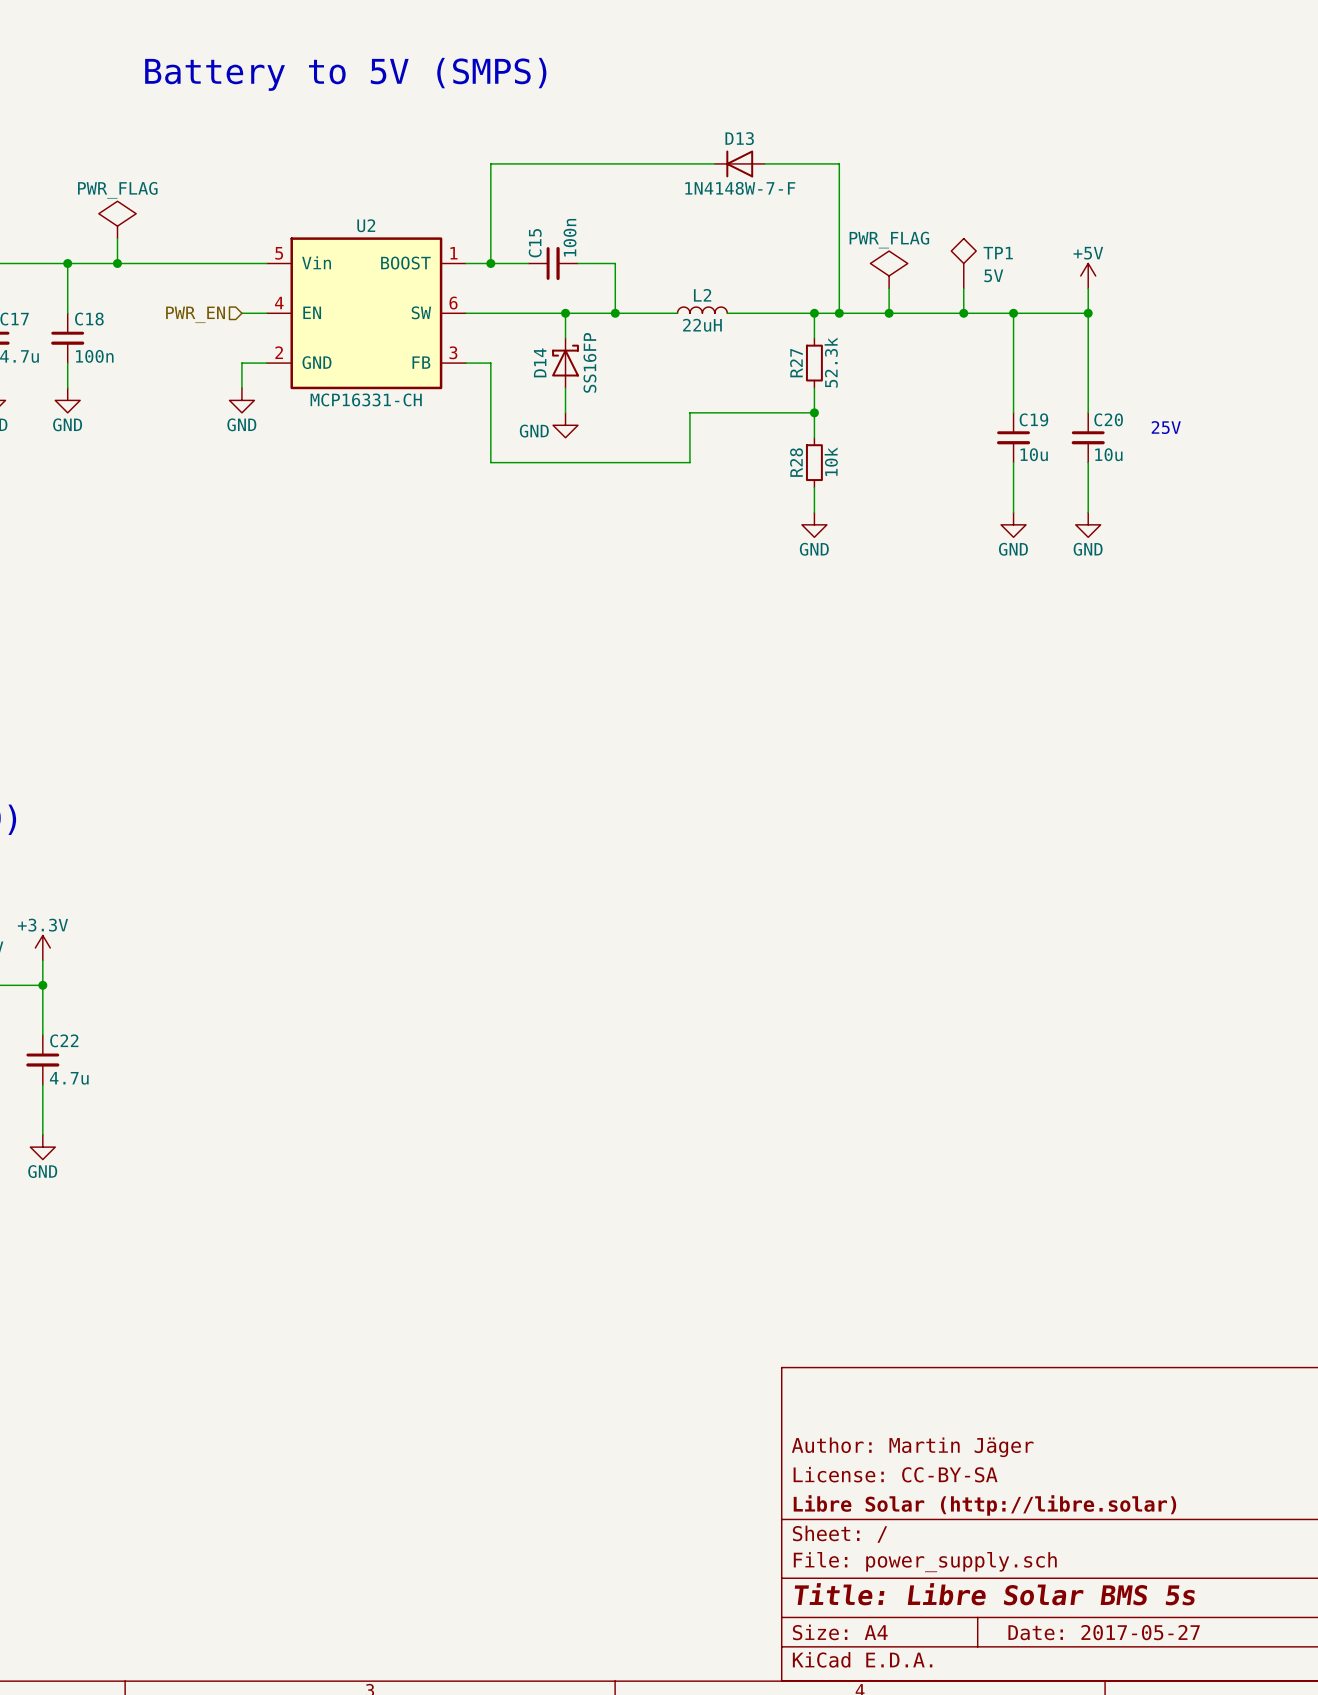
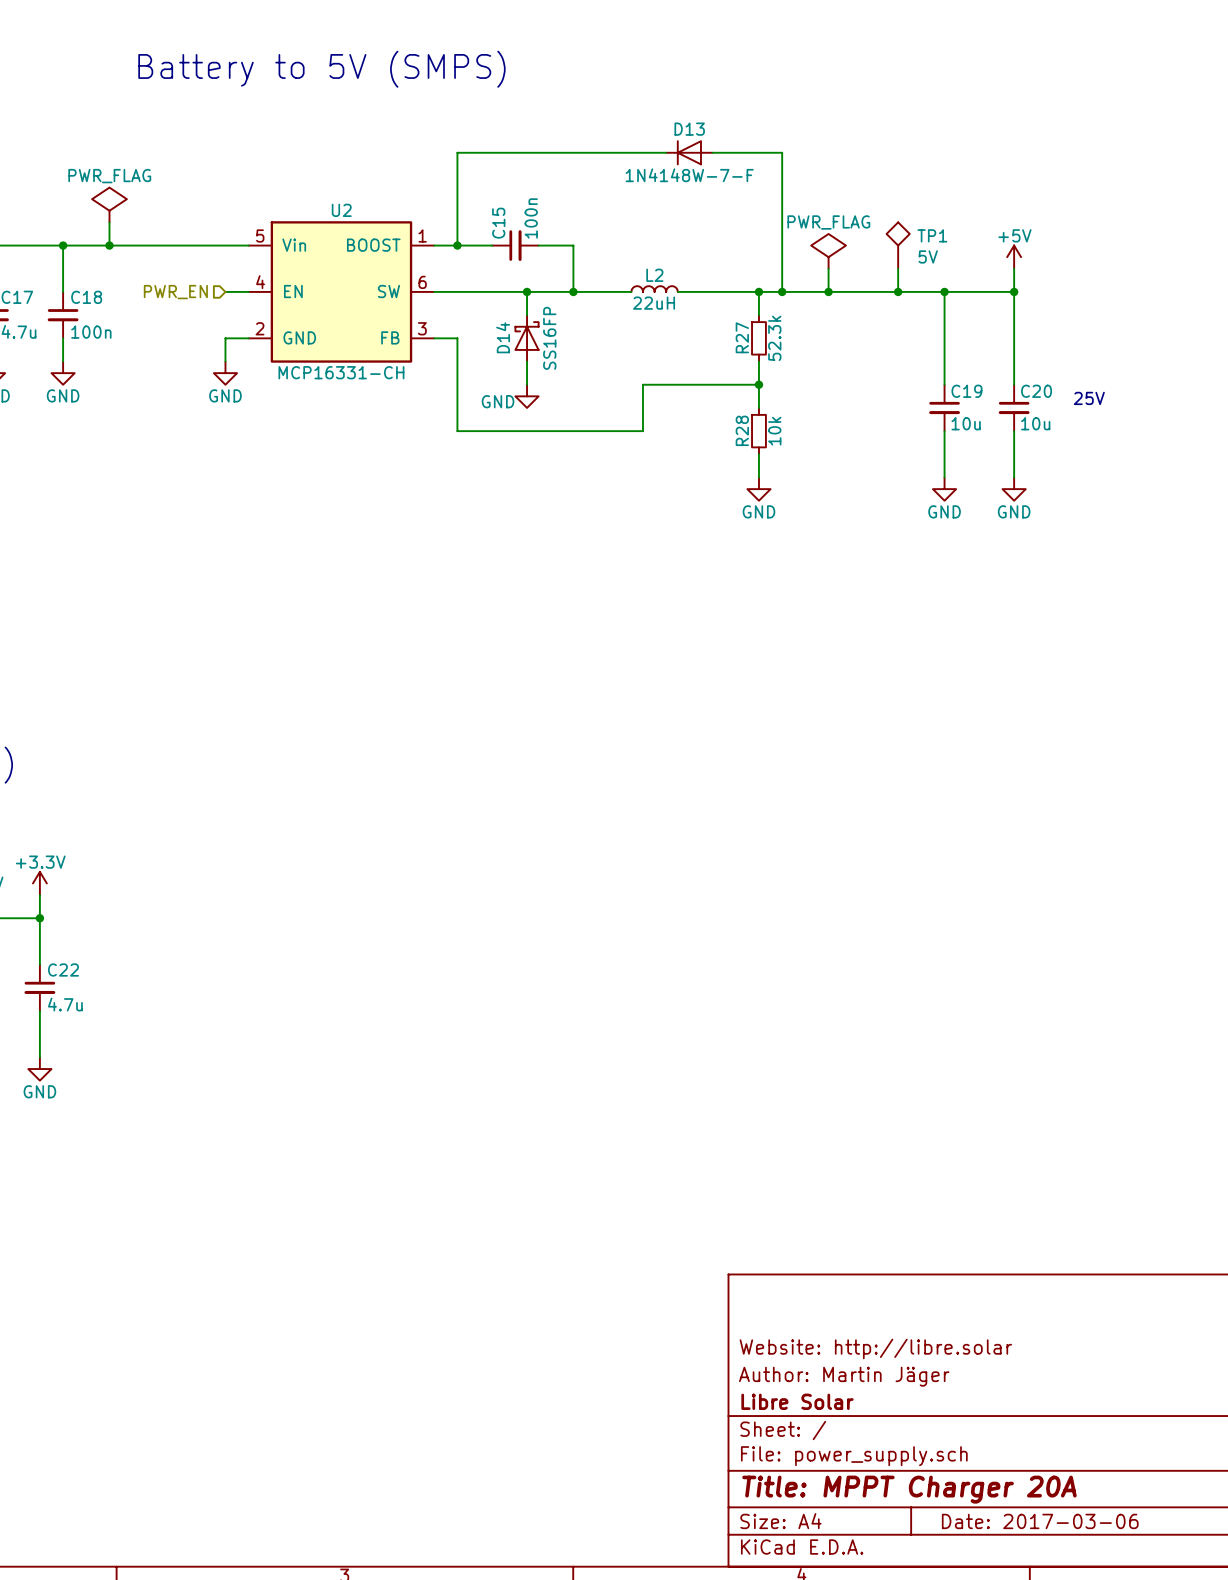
title block: Author: Martin Jäger (912, 1447) -> Website: http://libre.solar (875, 1348)
title block: License: CC-BY-SA (895, 1474) -> Author: Martin Jäger (844, 1376)
title block: Libre Solar (http://libre.solar) (984, 1505) -> Libre Solar (797, 1401)
title block: Title: Libre Solar BMS 5s (994, 1594) -> Title: MPPT Charger 20A (909, 1489)
title block: Date: 2017-05-27 (1104, 1632) -> Date: 2017-03-06 (1040, 1521)

